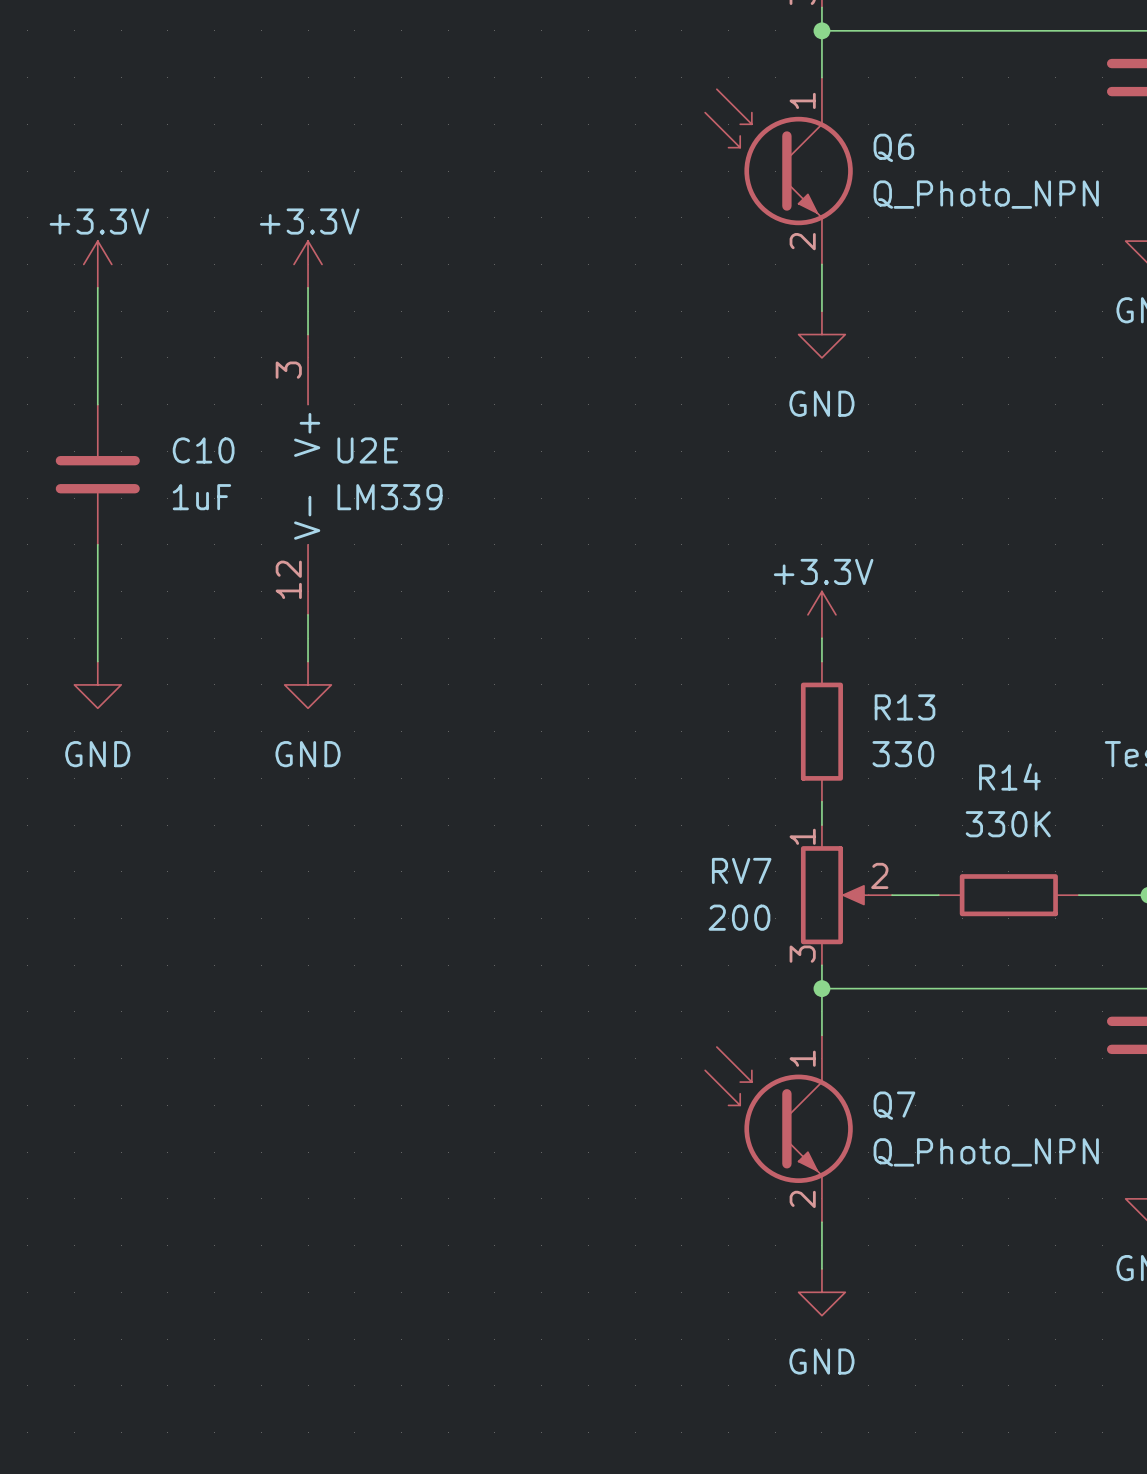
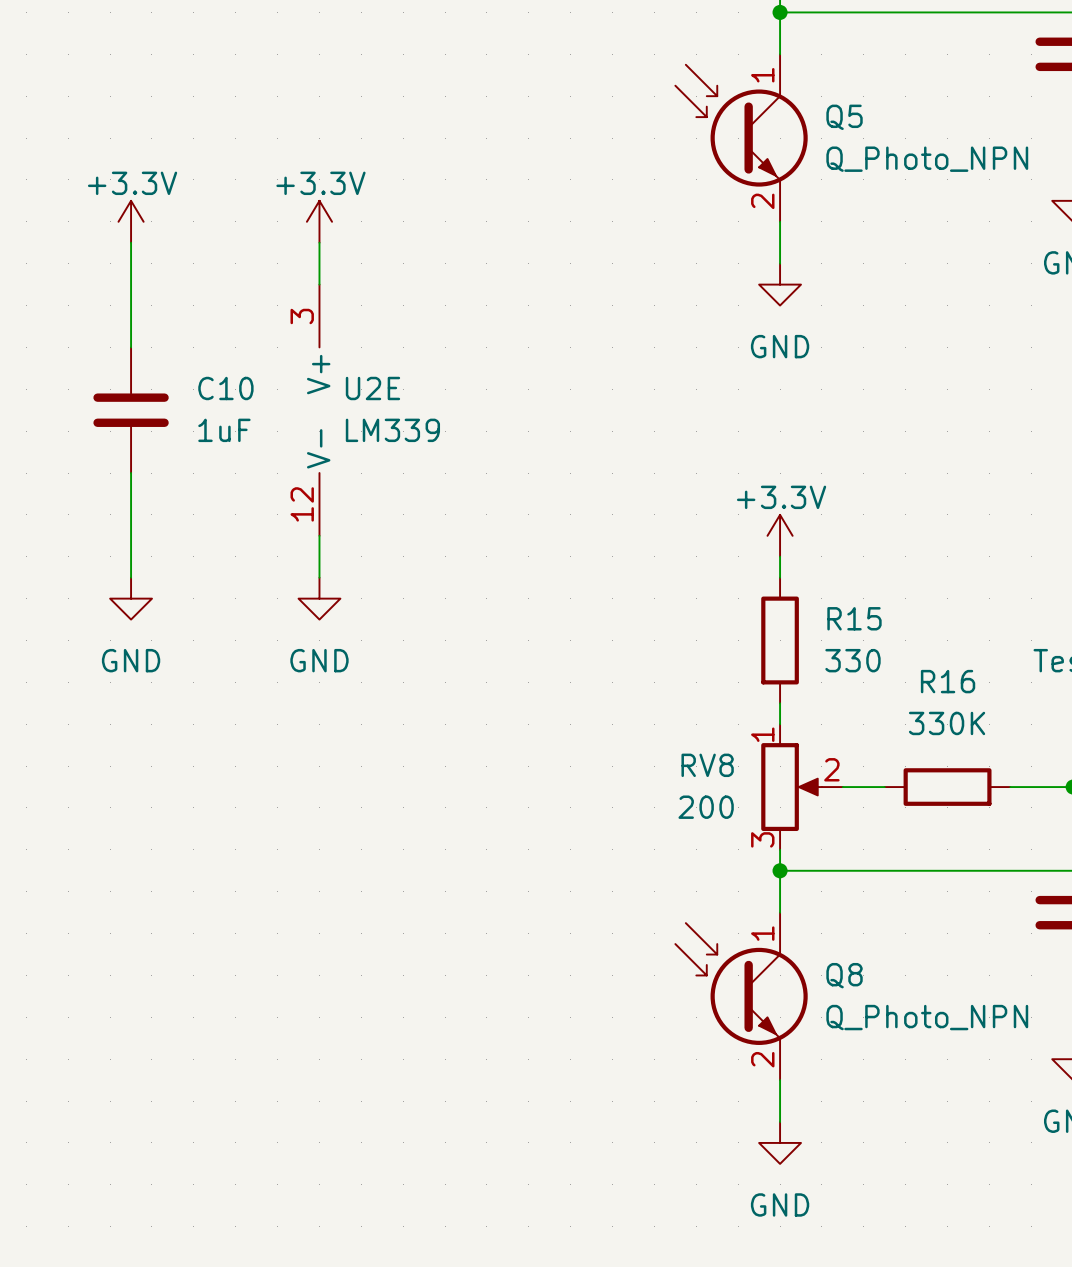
Q6 name: Q6 (893, 147) -> Q5 (844, 117)
R13 name: R13 (905, 707) -> R15 (854, 618)
R14 name: R14 (1009, 776) -> R16 (948, 681)
RV7 name: RV7 (741, 870) -> RV8 (707, 765)
Q7 name: Q7 (894, 1105) -> Q8 (844, 975)

